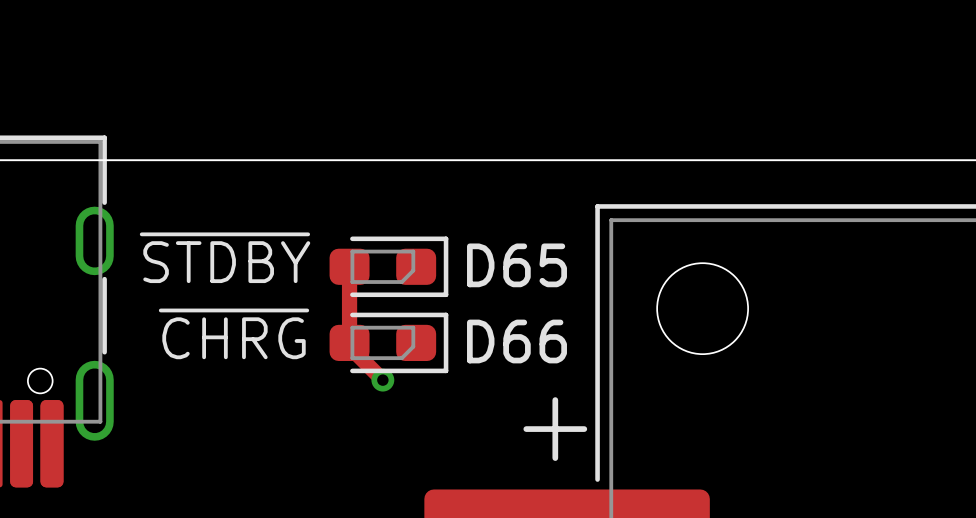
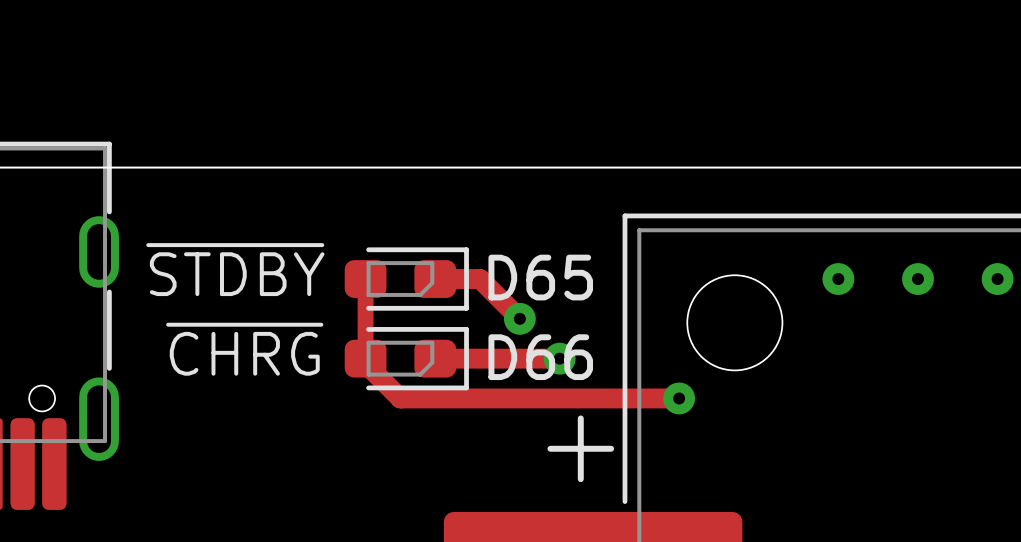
track: none -> (435, 279) (480, 279) (519, 318)
via: none -> (838, 279)
via: none -> (918, 279)
via: none -> (997, 279)
via: none -> (519, 318)
track: none -> (365, 358) (365, 363) (400, 398) (679, 398)
track: none -> (435, 358) (559, 358)
via: none -> (559, 358)
via: (382, 380) -> none
via: none -> (679, 398)

